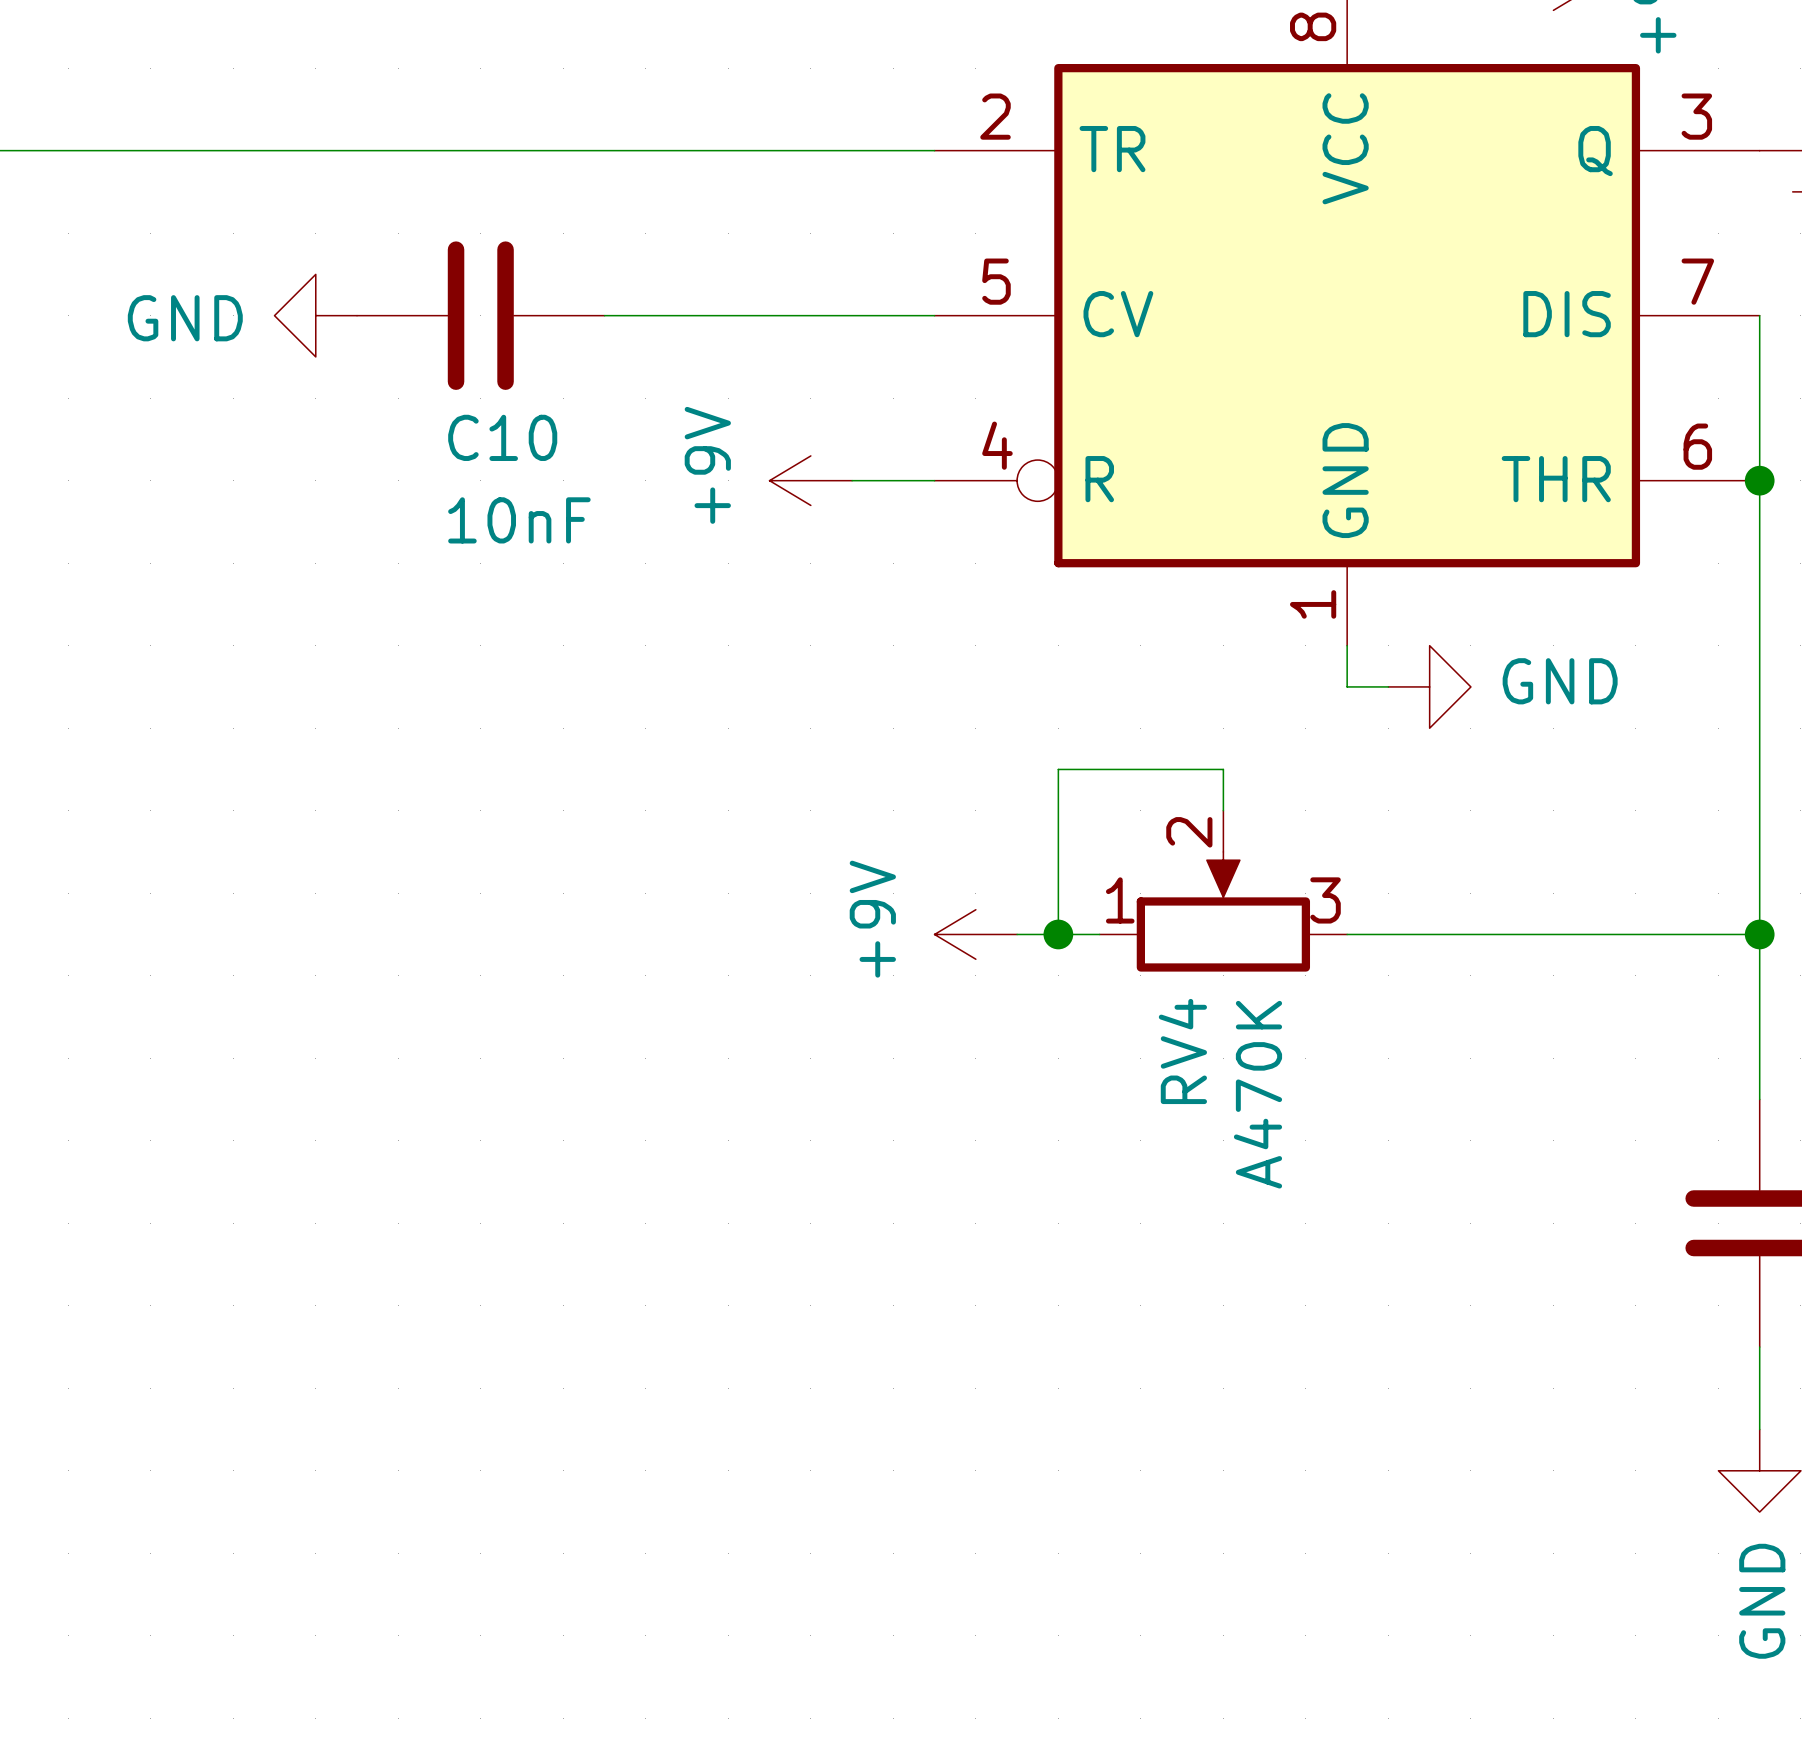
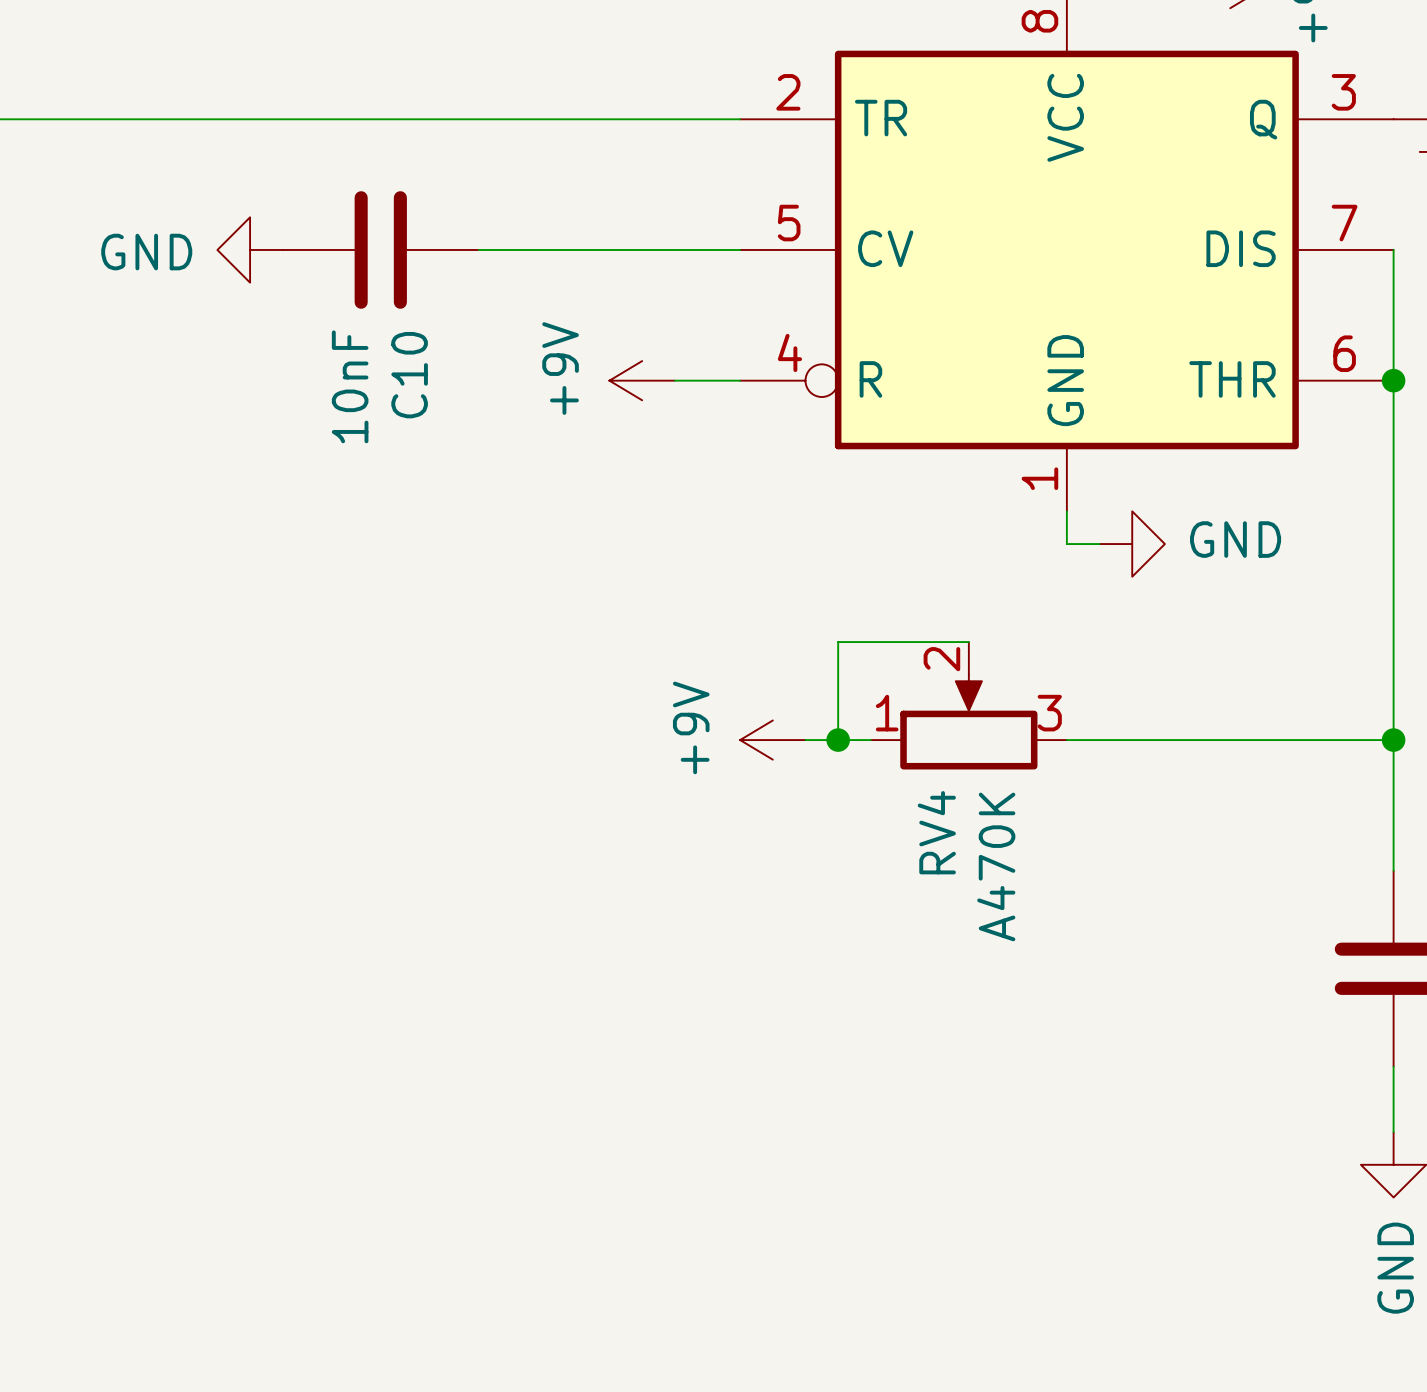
C10 name rotation: 0° (502, 437) -> 90° counterclockwise (409, 375)
C10 value rotation: 0° (519, 520) -> 90° counterclockwise (350, 386)
wire: (1058, 810) (1058, 769) (1223, 769) (1223, 810) -> (838, 642) (968, 642)

